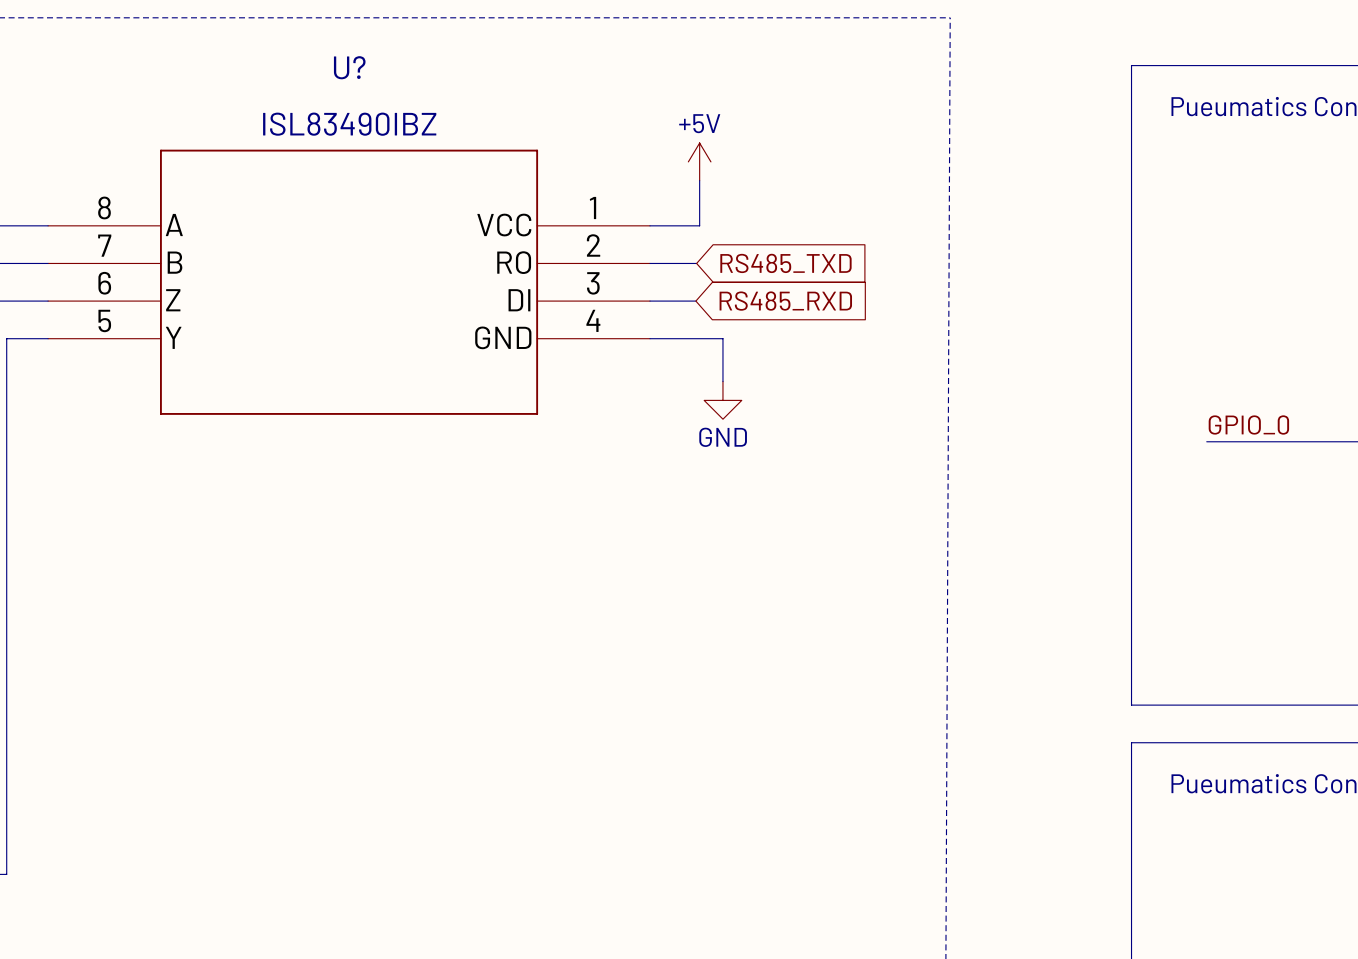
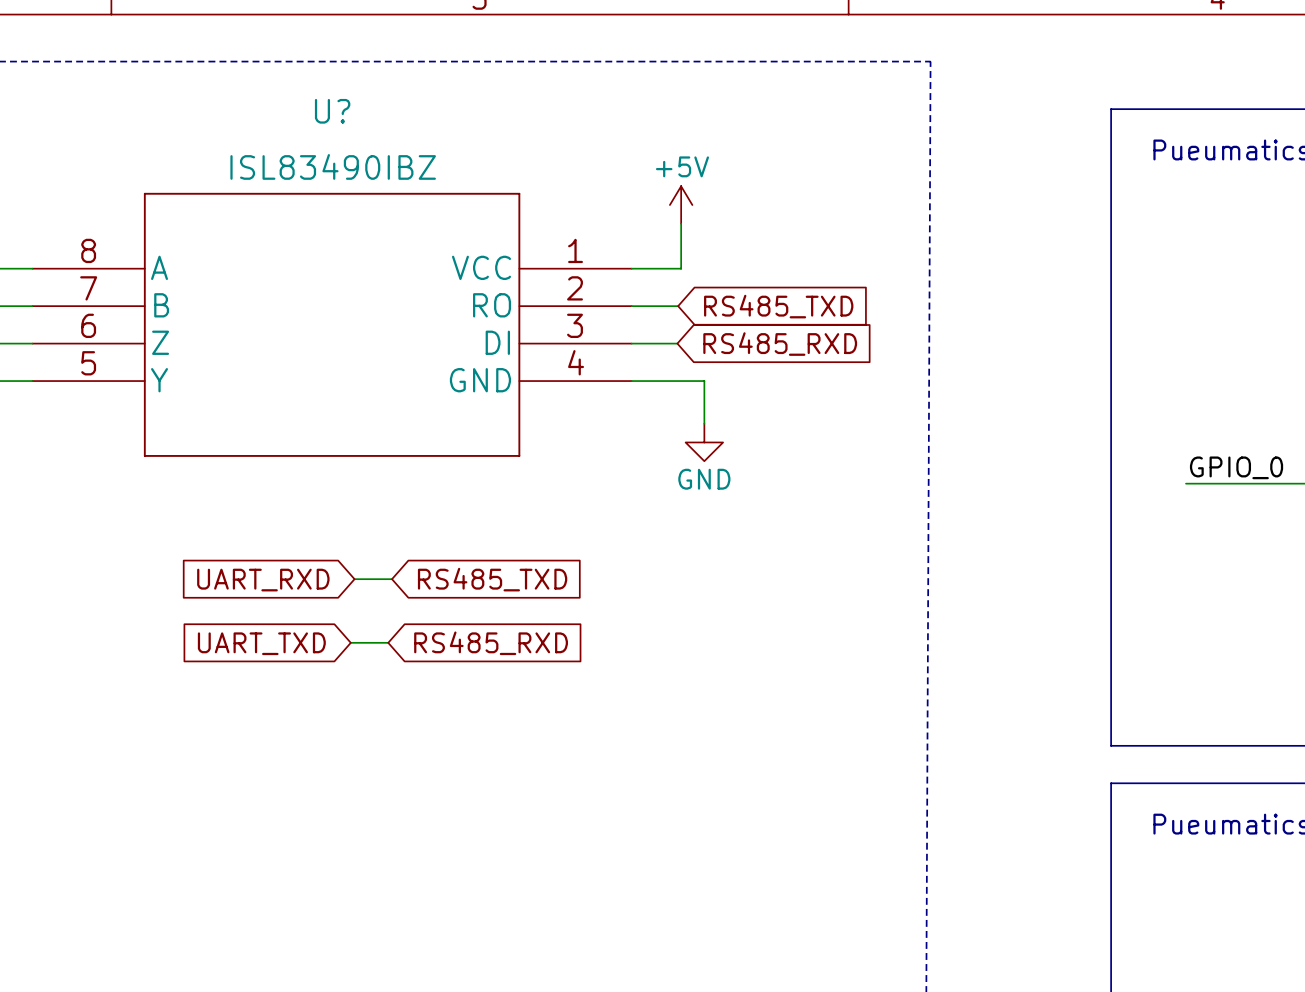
global label: none -> UART_RXD (263, 580)
wire: none -> (354, 579) (392, 579)
global label: none -> RS485_TXD (492, 579)
global label: none -> UART_TXD (261, 643)
wire: none -> (350, 642) (388, 642)
global label: none -> RS485_RXD (491, 643)

